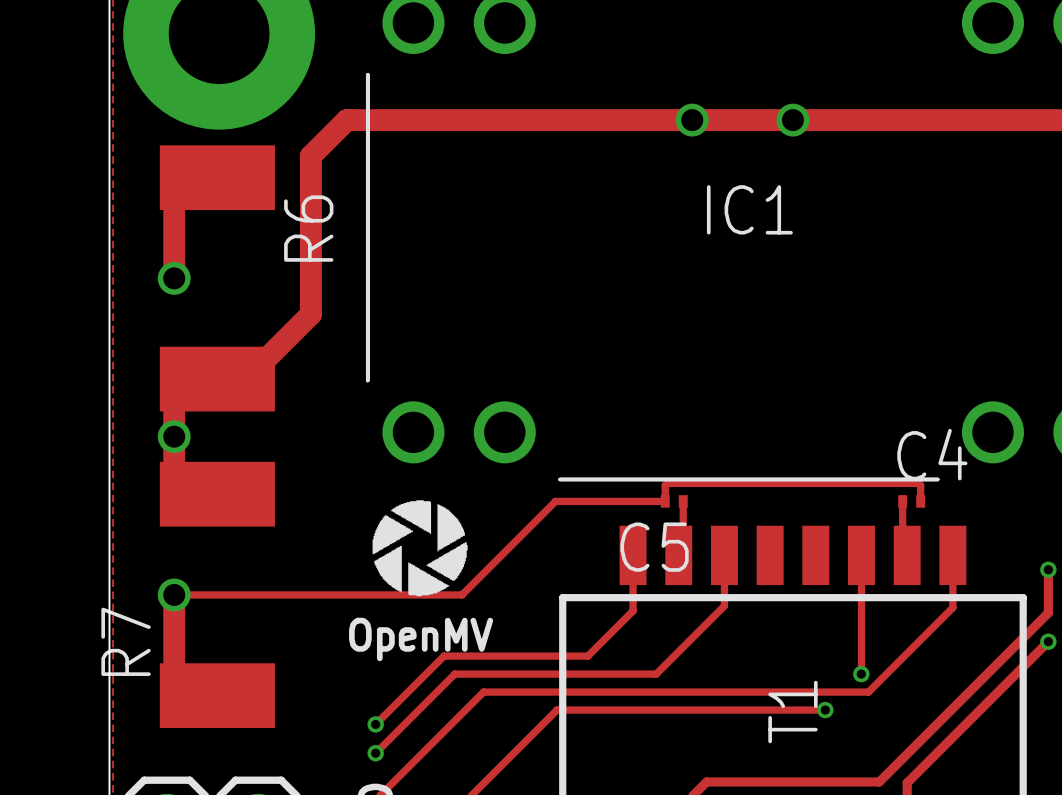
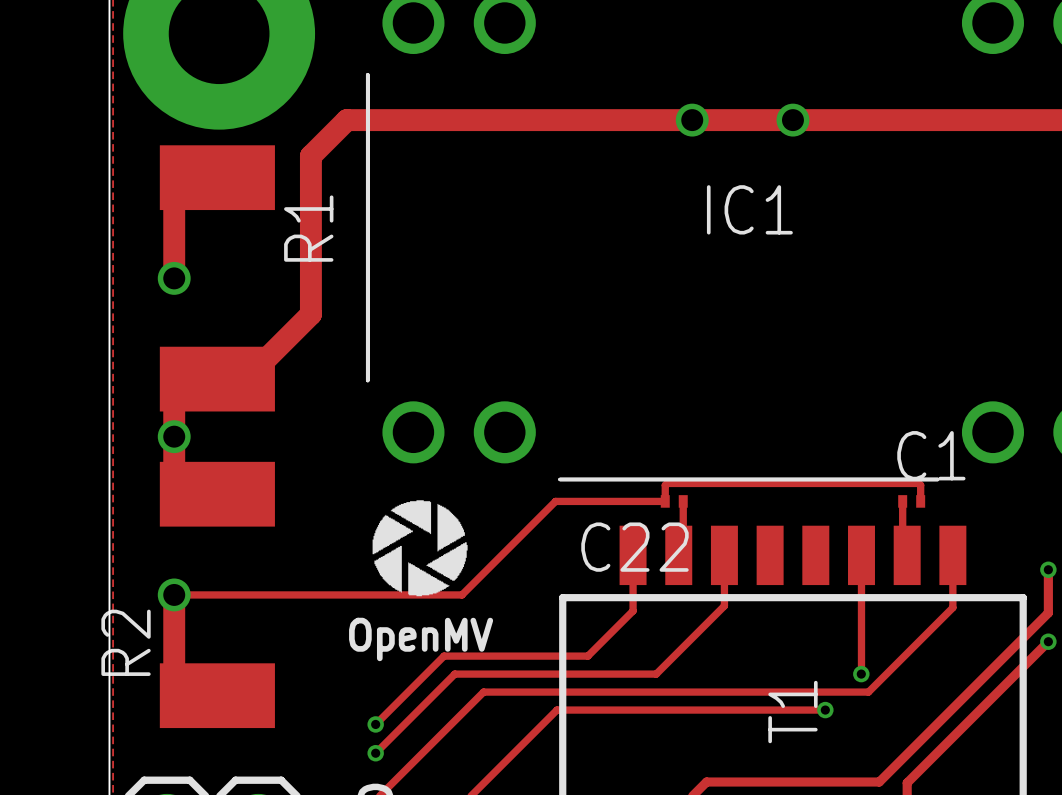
R6 name: R6 (308, 228) -> R1 (308, 228)
C4 name: C4 (932, 454) -> C1 (931, 455)
C5 name: C5 (654, 547) -> C22 (634, 547)
R7 name: R7 (126, 641) -> R2 (126, 642)

